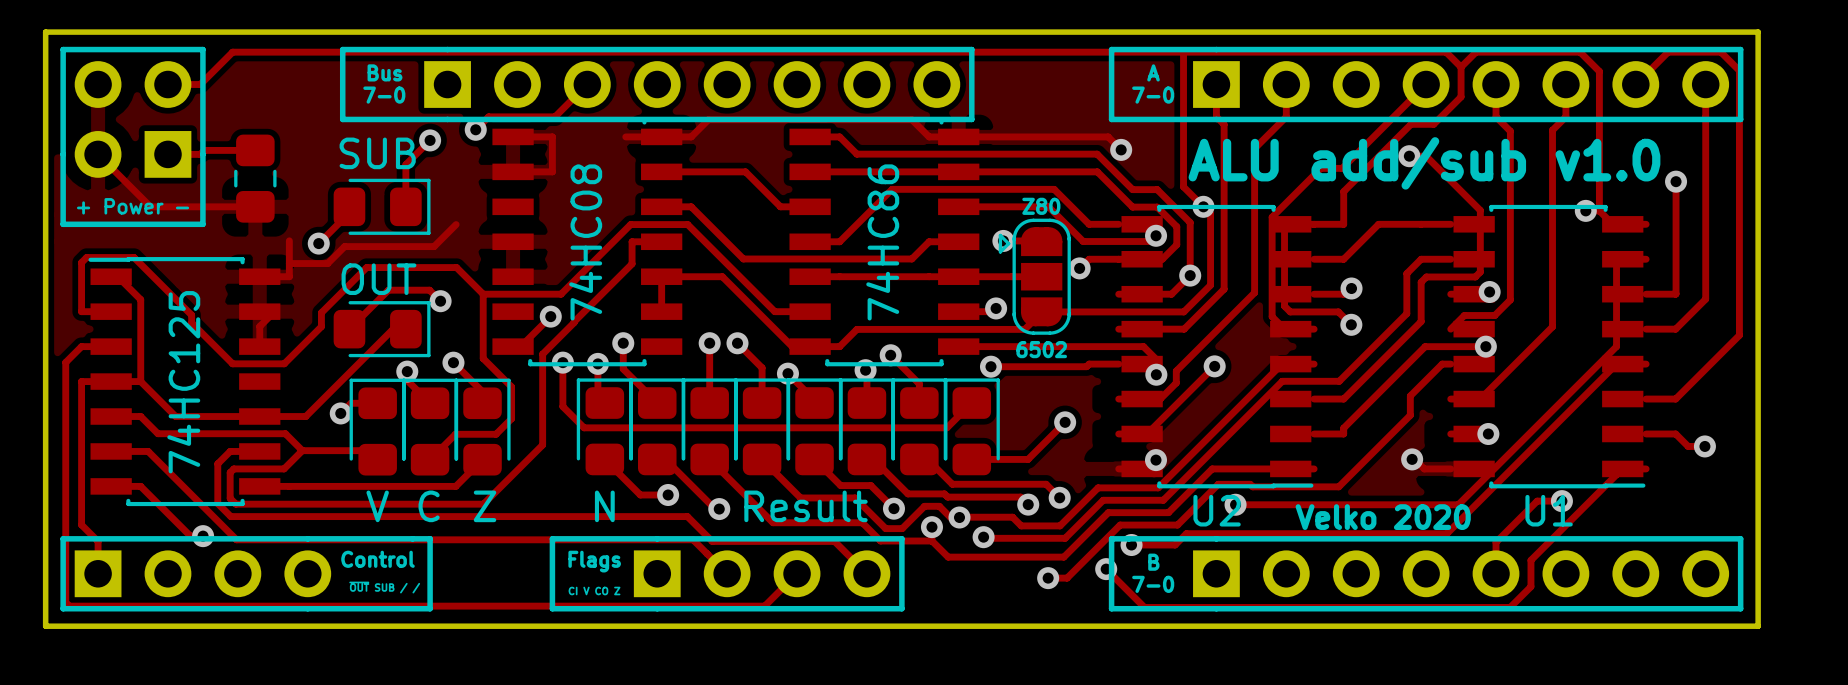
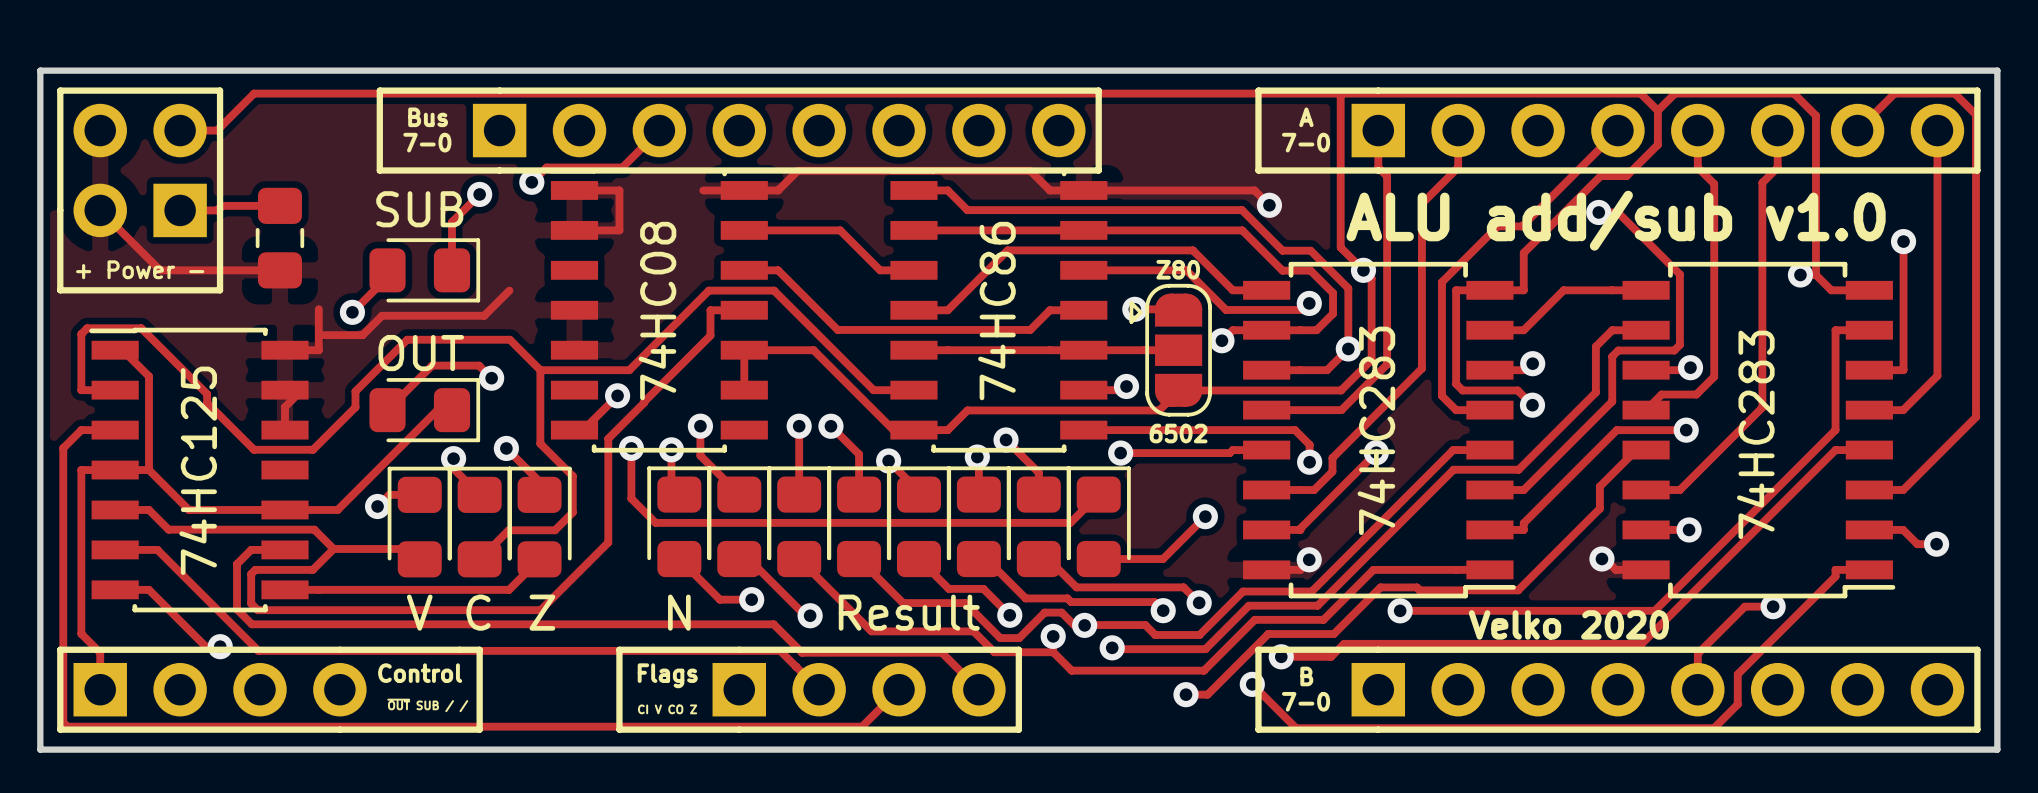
U2: (1217, 346) -> none
part: none -> 74HC283 (1379, 430)
U1: (1549, 346) -> none
part: none -> 74HC283 (1758, 430)

